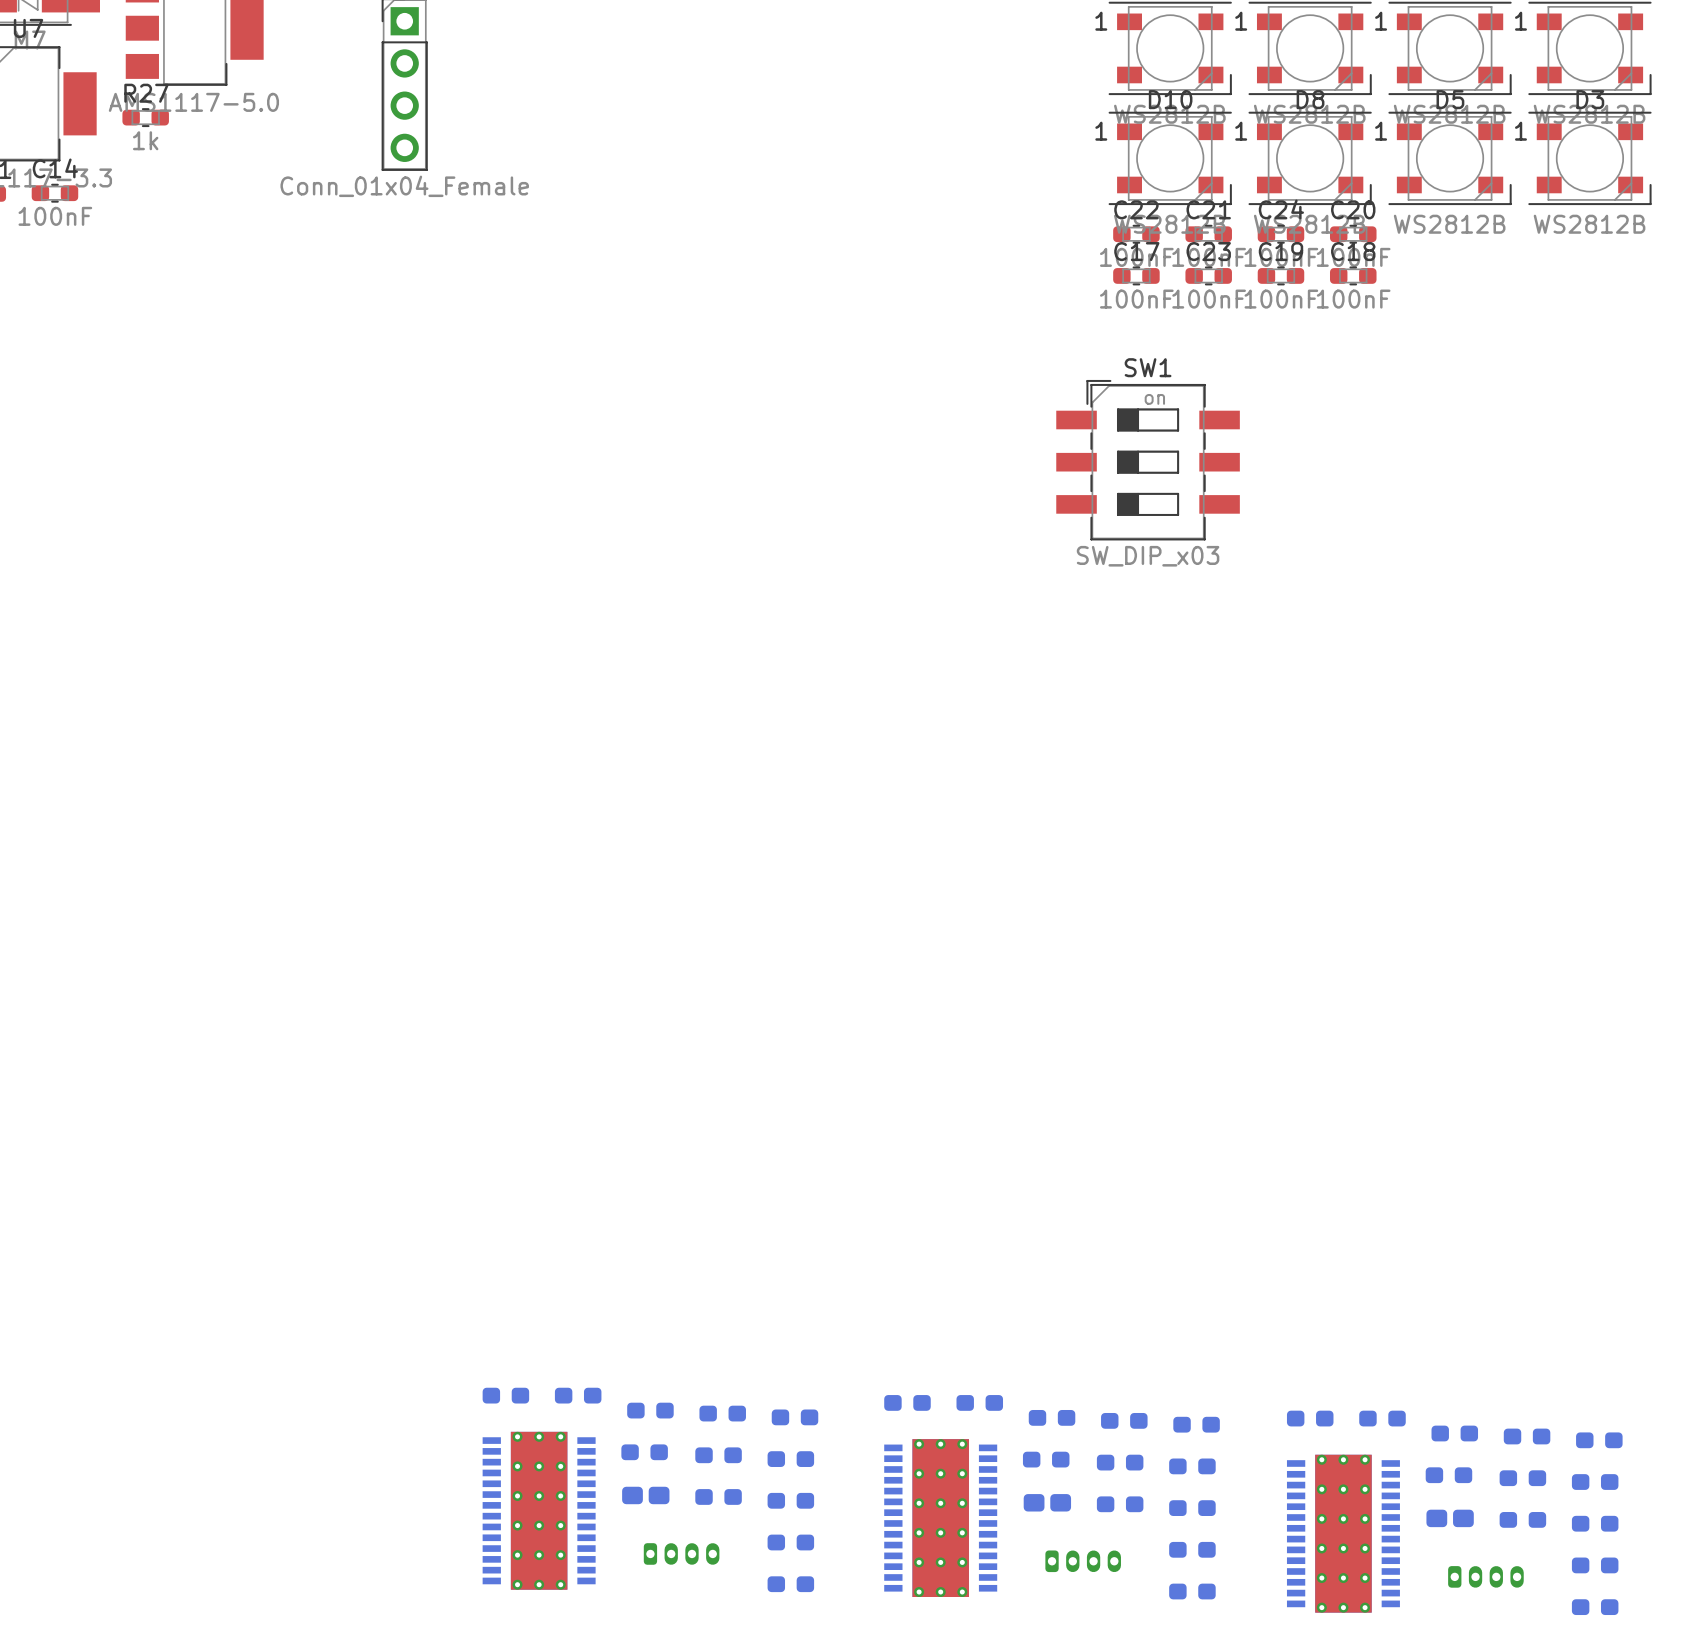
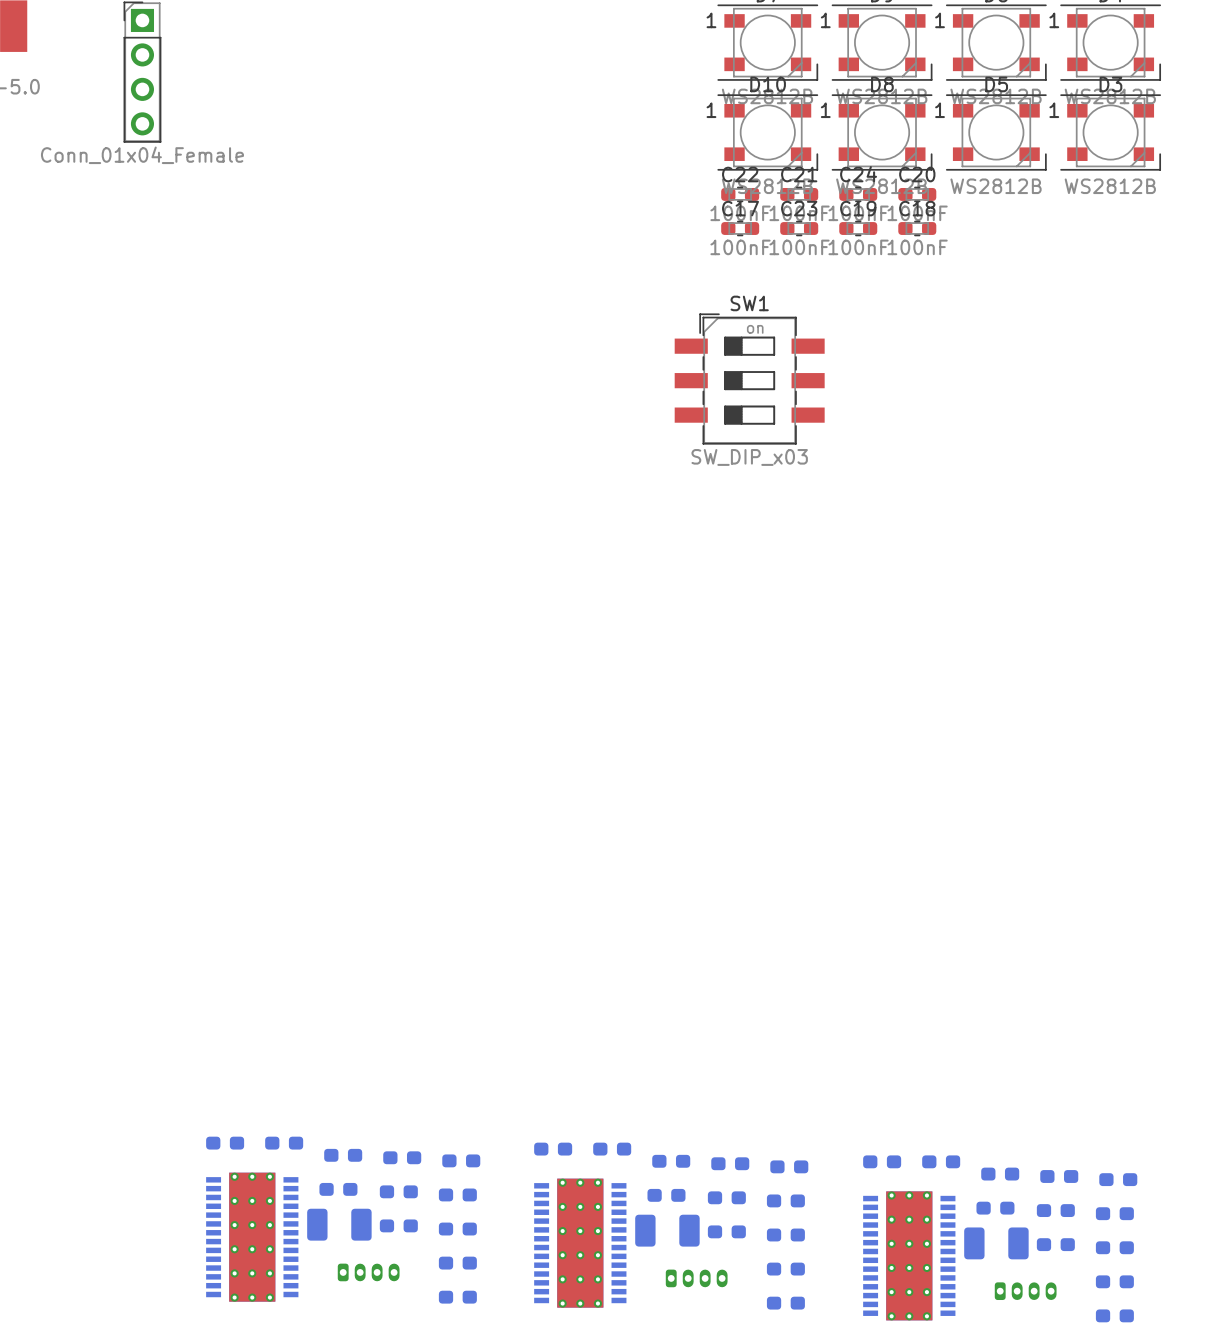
part footprint: [622, 1486, 670, 1505] -> [307, 1208, 372, 1241]
part footprint: [1023, 1494, 1072, 1512] -> [635, 1214, 700, 1247]
part footprint: [1426, 1509, 1474, 1528] -> [964, 1227, 1029, 1260]

